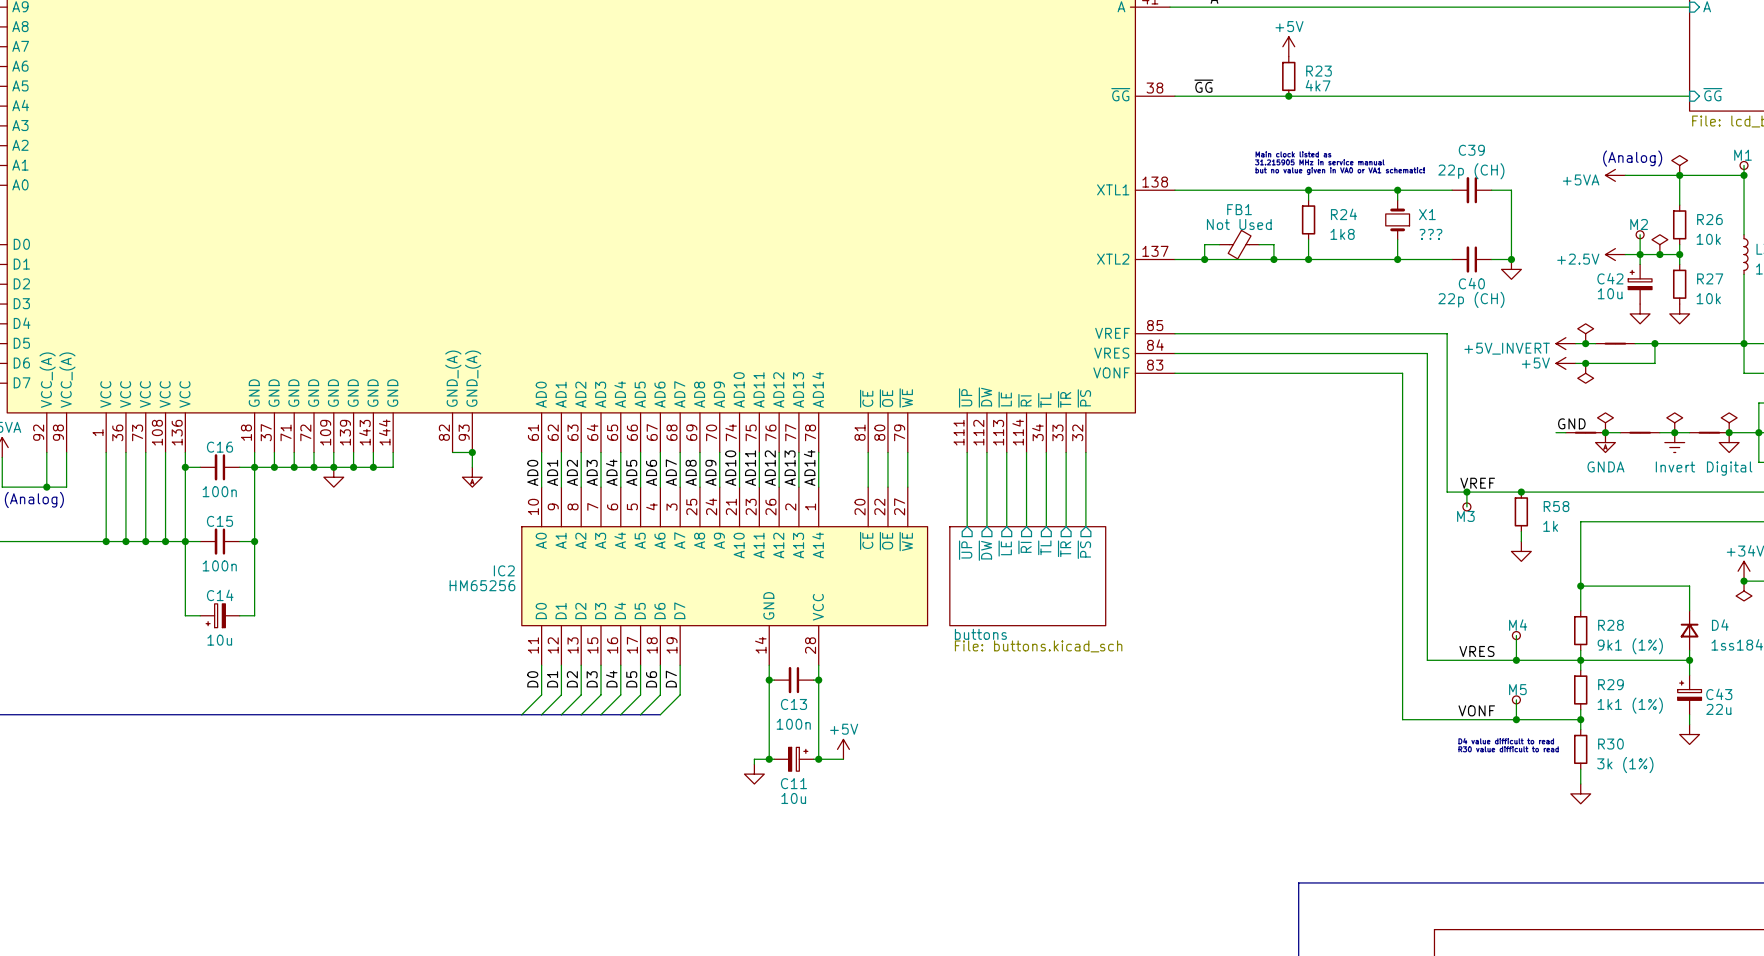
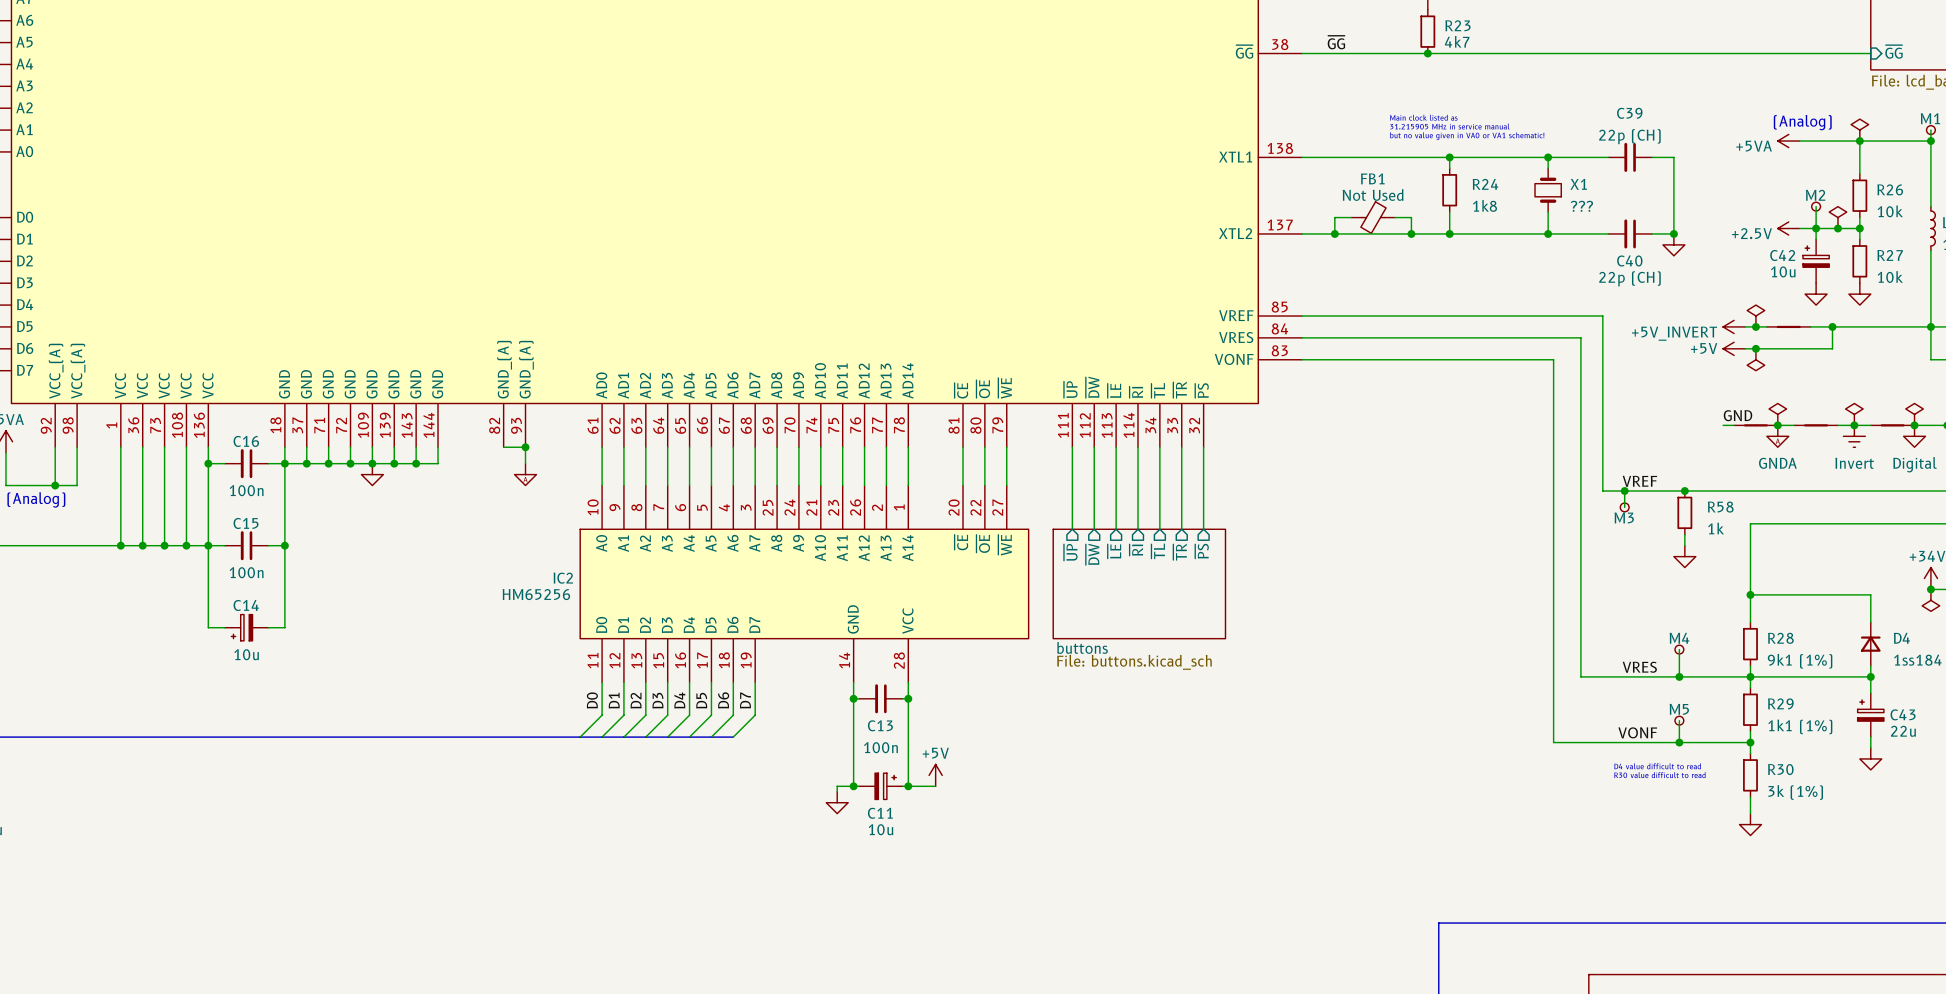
label: AD14 (809, 467) -> none
label: AD10 (730, 468) -> none
label: AD11 (750, 468) -> none
label: AD12 (770, 468) -> none
label: AD13 (790, 468) -> none
label: AD0 (532, 472) -> none
label: AD1 (552, 472) -> none
label: AD2 (572, 472) -> none
label: AD3 (592, 472) -> none
label: AD4 (611, 472) -> none
label: AD5 (631, 472) -> none
label: AD6 (651, 472) -> none
label: AD7 (671, 472) -> none
label: AD8 (691, 472) -> none
label: AD9 (710, 472) -> none

